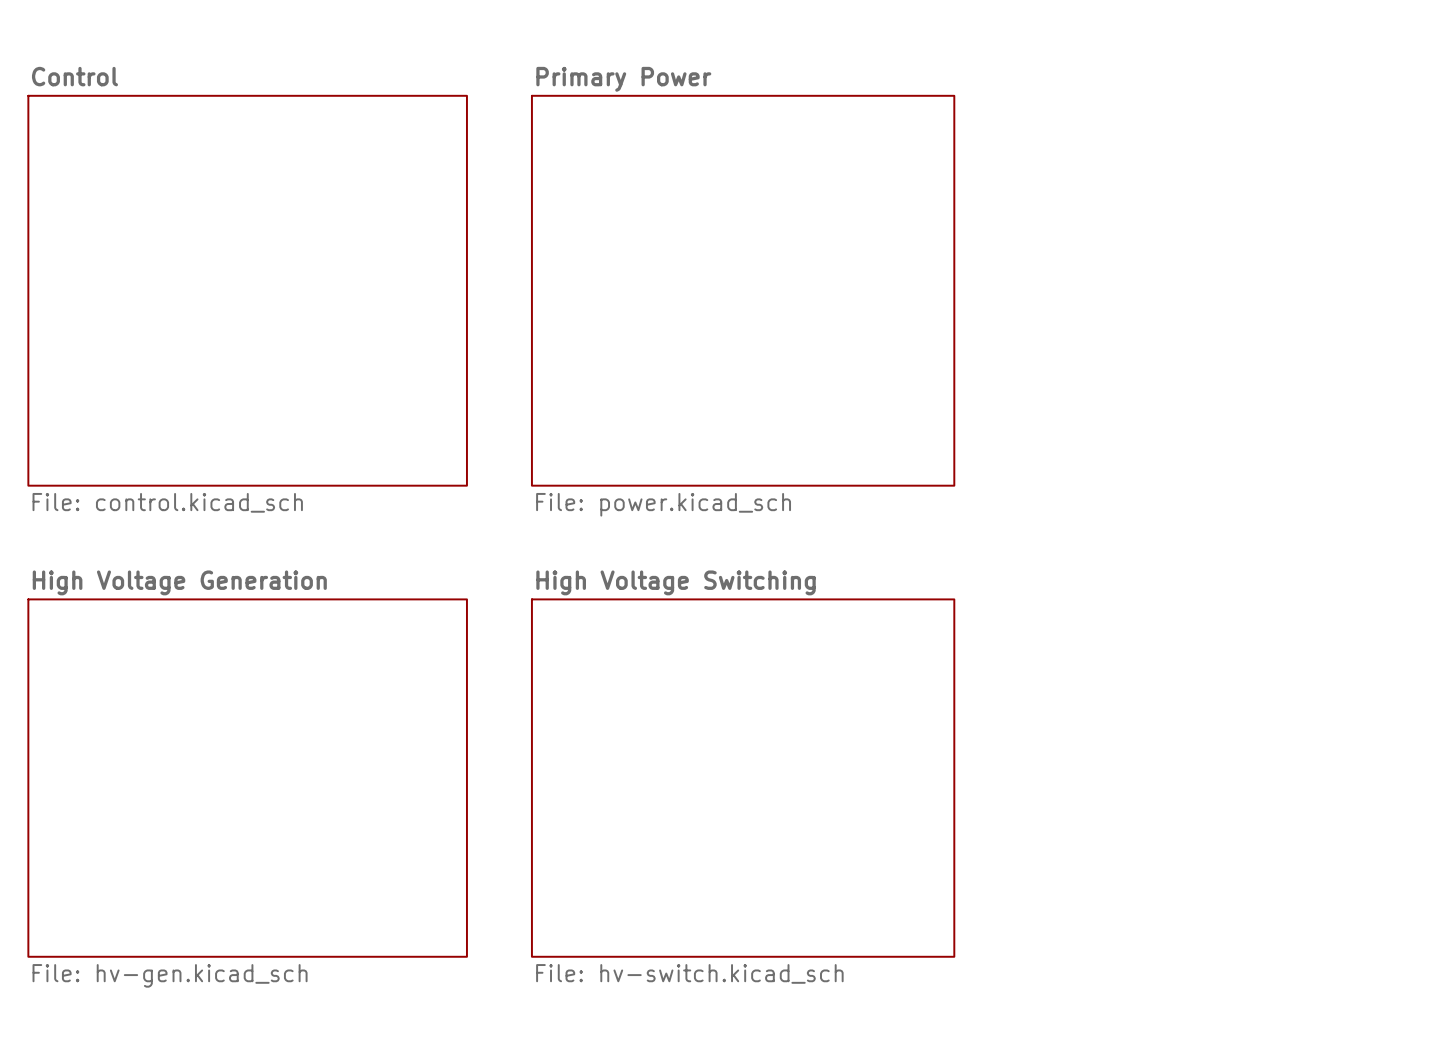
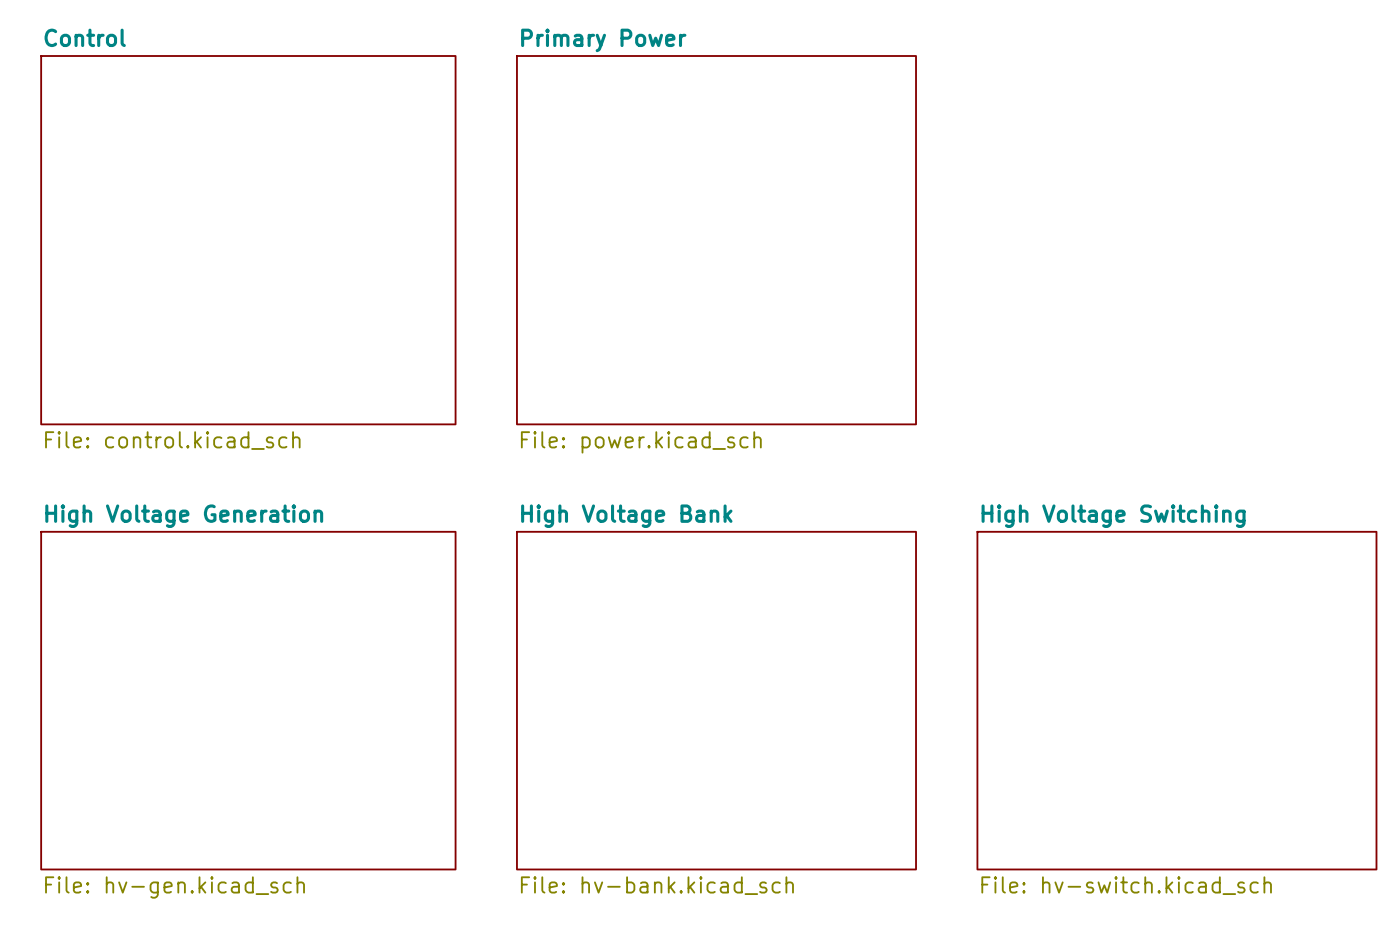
sheet High Voltage Switching name: High Voltage Switching (676, 582) -> High Voltage Bank (626, 516)
sheet High Voltage Switching: none -> File: hv-switch.kicad_sch (1176, 700)
sheet High Voltage Switching value: File: hv-switch.kicad_sch (689, 973) -> File: hv-bank.kicad_sch (657, 885)

